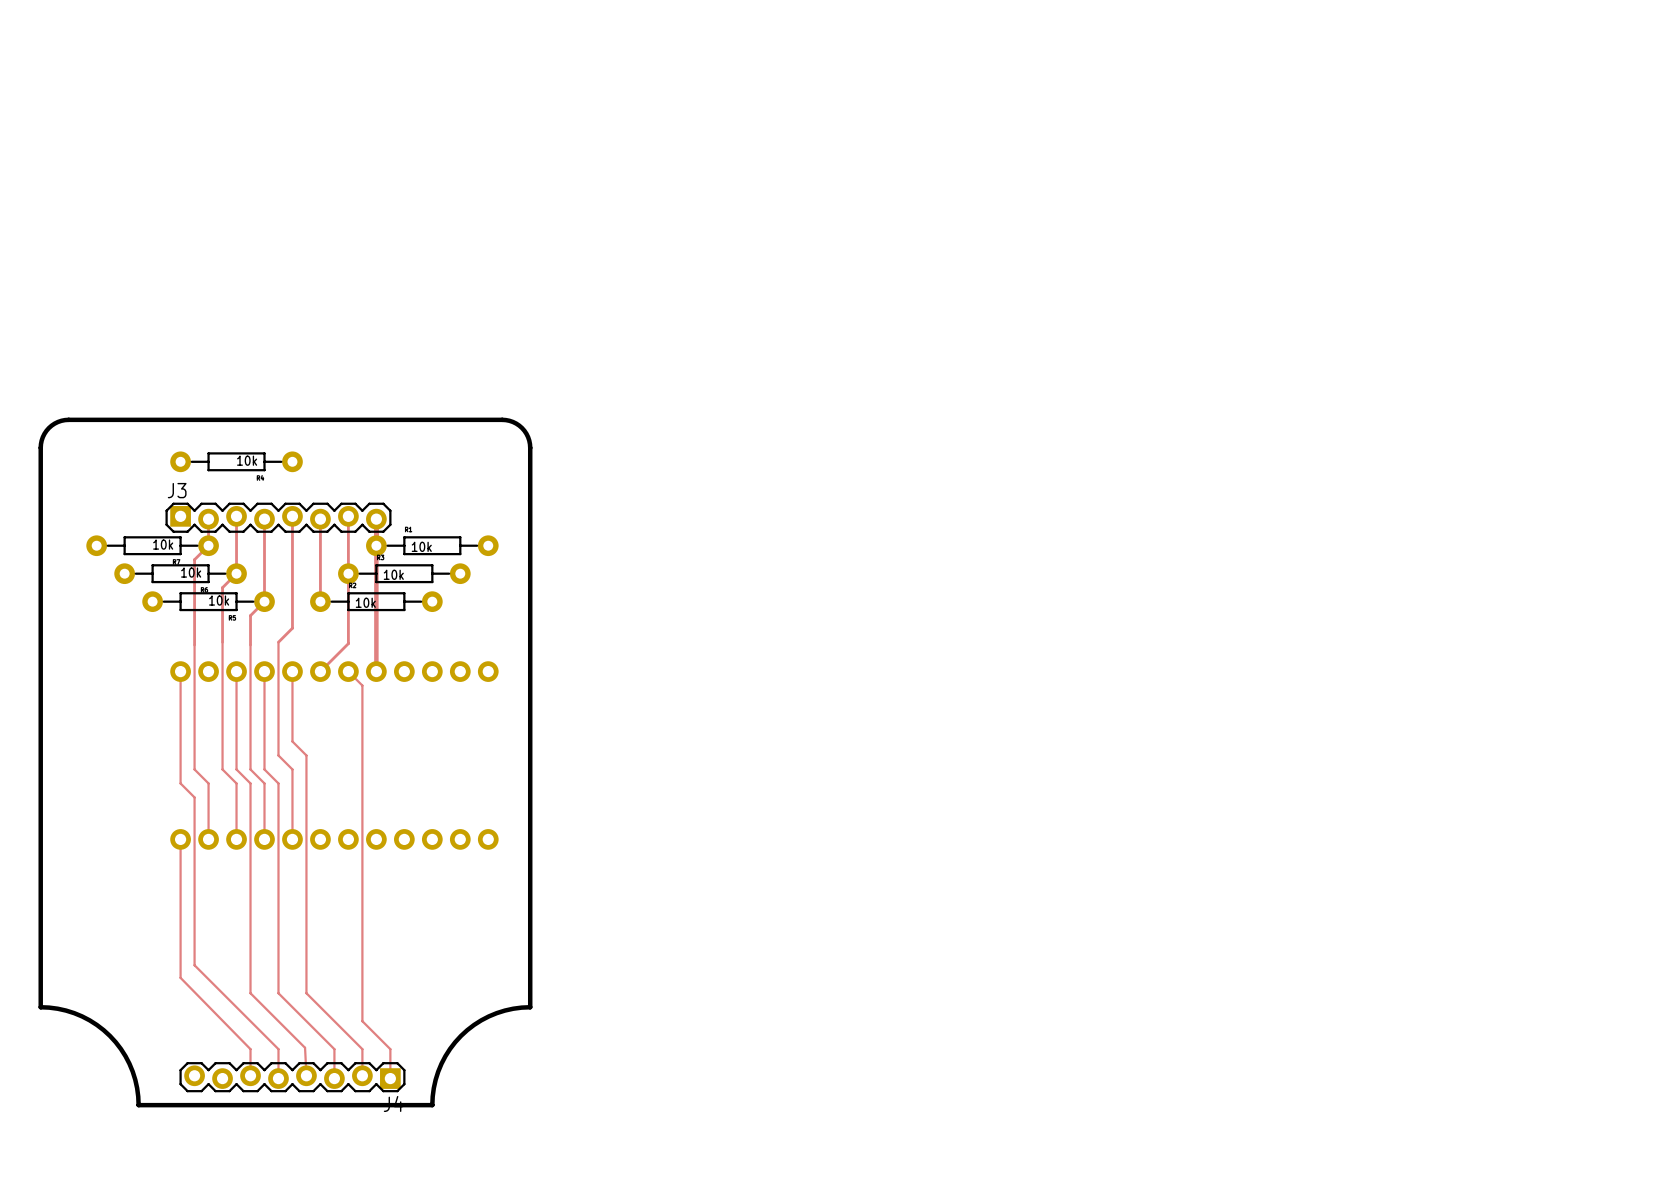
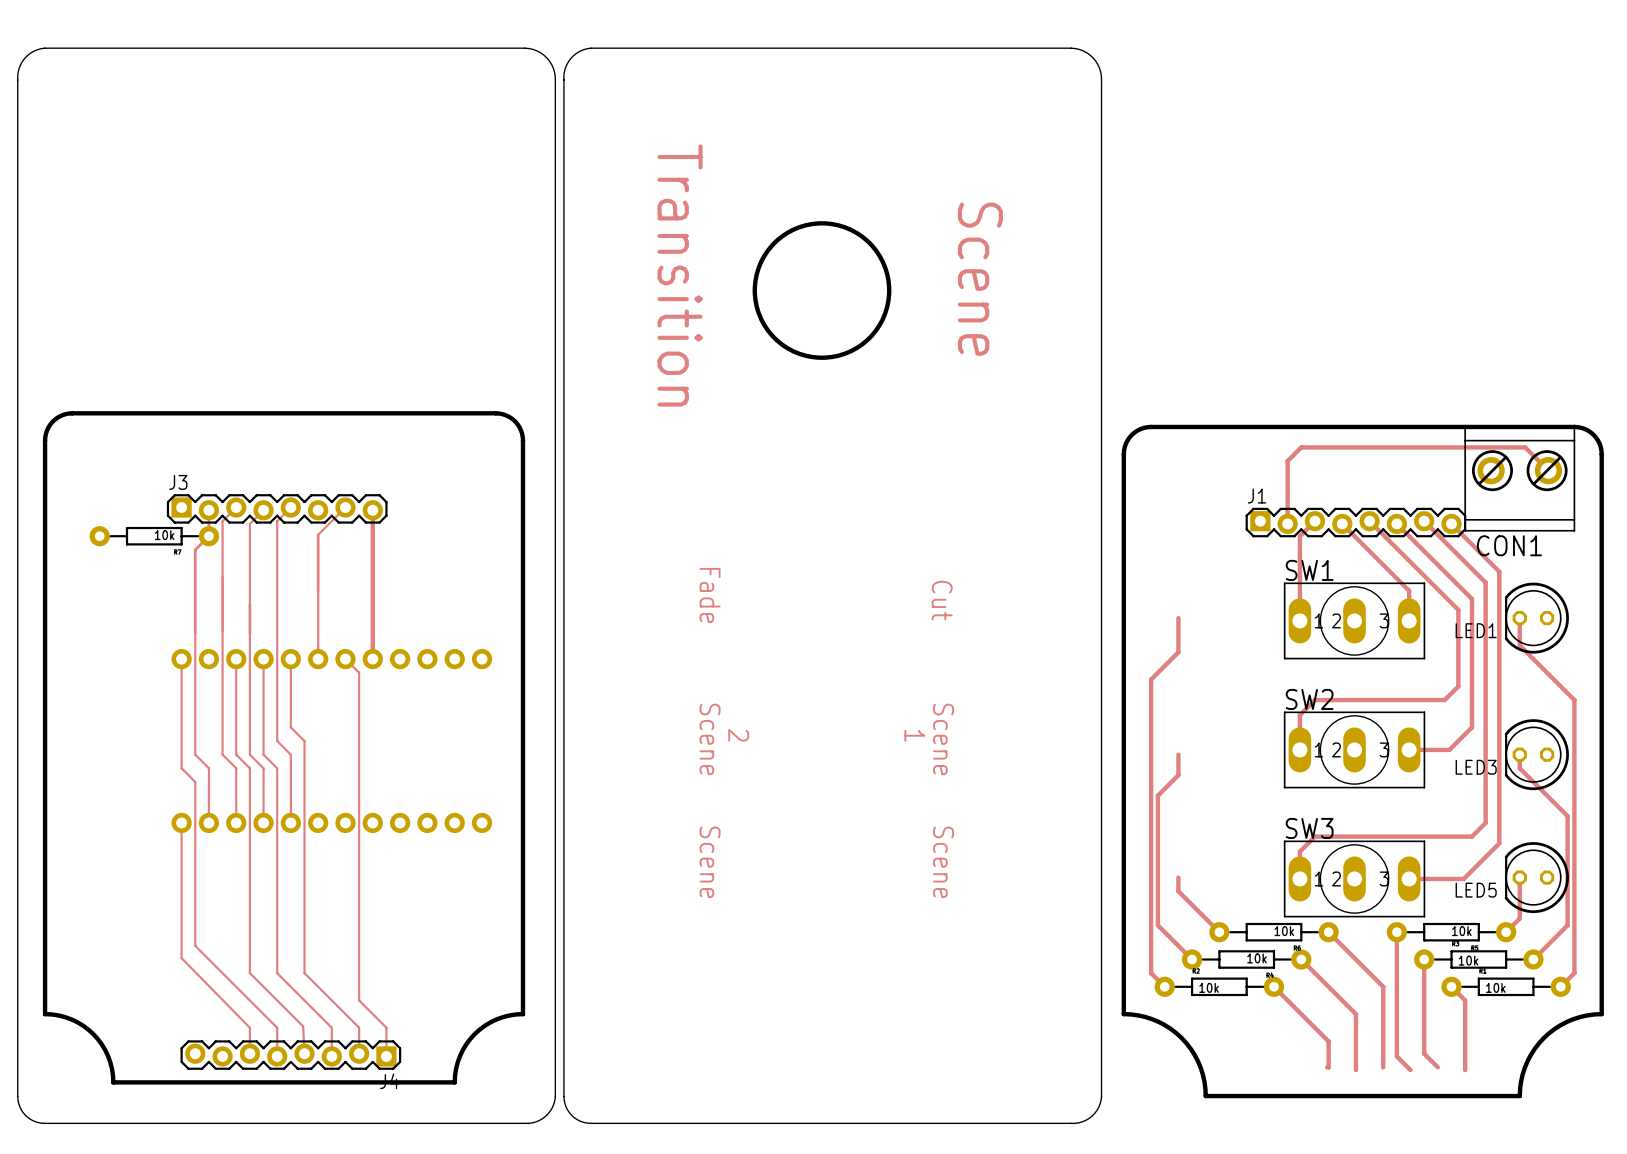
drawing: none -> [17, 48, 1102, 1124]
round board edge: none -> [752, 221, 892, 360]
text: none -> Transition (680, 275)
text: none -> Scene (980, 279)
board edge: none -> (1151, 426) (1574, 426) (1588, 430) (1598, 440) (1601, 454) (1601, 1014) (1580, 1016) (1567, 1021) (1543, 1038) (1527, 1061) (1522, 1074) (1519, 1096) (1205, 1096) (1202, 1074) (1198, 1061) (1181, 1038) (1158, 1021) (1145, 1016) (1123, 1014) (1123, 454) (1125, 443) (1131, 434) (1140, 429) (1151, 426)
part position: (236, 461) -> (1246, 959)
track: none -> (1548, 470) (1525, 447) (1301, 447) (1287, 461) (1287, 523)
CON1: none -> (1519, 478)
track: (236, 516) (236, 573) (222, 587) -> (236, 507) (222, 521) (222, 577)
track: (292, 516) (292, 628) (278, 642) -> (290, 507) (277, 521) (277, 630)
track: (348, 516) (348, 643) (320, 671) -> (318, 590) (318, 659)
track: (264, 519) (264, 601) (250, 615) -> (263, 510) (249, 523) (249, 604)
track: (320, 519) (320, 544) -> (345, 507) (318, 534)
track: none -> (1314, 521) (1299, 536) (1299, 620)
track: none -> (1369, 521) (1458, 609) (1458, 686) (1444, 700) (1314, 700) (1299, 715) (1299, 749)
track: none -> (1424, 521) (1485, 582) (1485, 822) (1471, 836) (1314, 836) (1299, 851) (1299, 878)
J1: none -> (1355, 522)
track: none -> (1342, 523) (1409, 590) (1409, 620)
track: none -> (1396, 523) (1471, 599) (1471, 727) (1449, 749) (1409, 749)
track: none -> (1451, 523) (1499, 571) (1499, 843) (1463, 878) (1409, 878)
part position: (432, 545) -> (1506, 986)
part position: (180, 573) -> (1274, 932)
part position: (404, 573) -> (1478, 959)
part position: (208, 601) -> (1451, 932)
part position: (376, 601) -> (1219, 986)
text: none -> Fade (710, 595)
text: none -> Cut (942, 600)
track: none -> (1178, 618) (1178, 652) (1151, 679) (1151, 973) (1164, 986)
track: none -> (1519, 618) (1519, 645) (1574, 700) (1574, 973) (1560, 986)
LED1: none -> (1536, 618)
SW1: none -> (1354, 620)
text: none -> 2 (738, 735)
text: none -> 1 (914, 735)
text: none -> Scene (710, 739)
text: none -> Scene (943, 739)
SW2: none -> (1354, 749)
track: none -> (1178, 754) (1178, 775) (1157, 795) (1157, 925) (1192, 959)
track: none -> (1519, 754) (1519, 768) (1567, 816) (1567, 925) (1533, 959)
LED3: none -> (1536, 754)
text: none -> Scene (710, 862)
text: none -> Scene (943, 862)
track: none -> (1178, 877) (1178, 891) (1219, 932)
track: none -> (1519, 877) (1519, 918) (1506, 932)
LED5: none -> (1536, 877)
SW3: none -> (1354, 878)
track: none -> (1328, 932) (1383, 986) (1383, 1067)
track: none -> (1396, 932) (1396, 1056) (1410, 1070)
track: none -> (1301, 959) (1355, 1014) (1355, 1070)
track: none -> (1424, 959) (1424, 1053) (1437, 1067)
board edge: (40, 1007) (74, 1013) (96, 1024) (109, 1035) (120, 1048) (132, 1071) (138, 1105) -> (45, 986) (45, 1014) (71, 1019) (93, 1034) (108, 1056) (113, 1082) (140, 1082)
board edge: (530, 1007) (496, 1013) (474, 1024) (461, 1035) (450, 1048) (438, 1071) (432, 1105) -> (522, 986) (522, 1014) (496, 1019) (474, 1034) (459, 1056) (454, 1082) (427, 1082)
track: none -> (1274, 986) (1328, 1041) (1327, 1067)
track: none -> (1451, 986) (1465, 1000) (1465, 1070)

